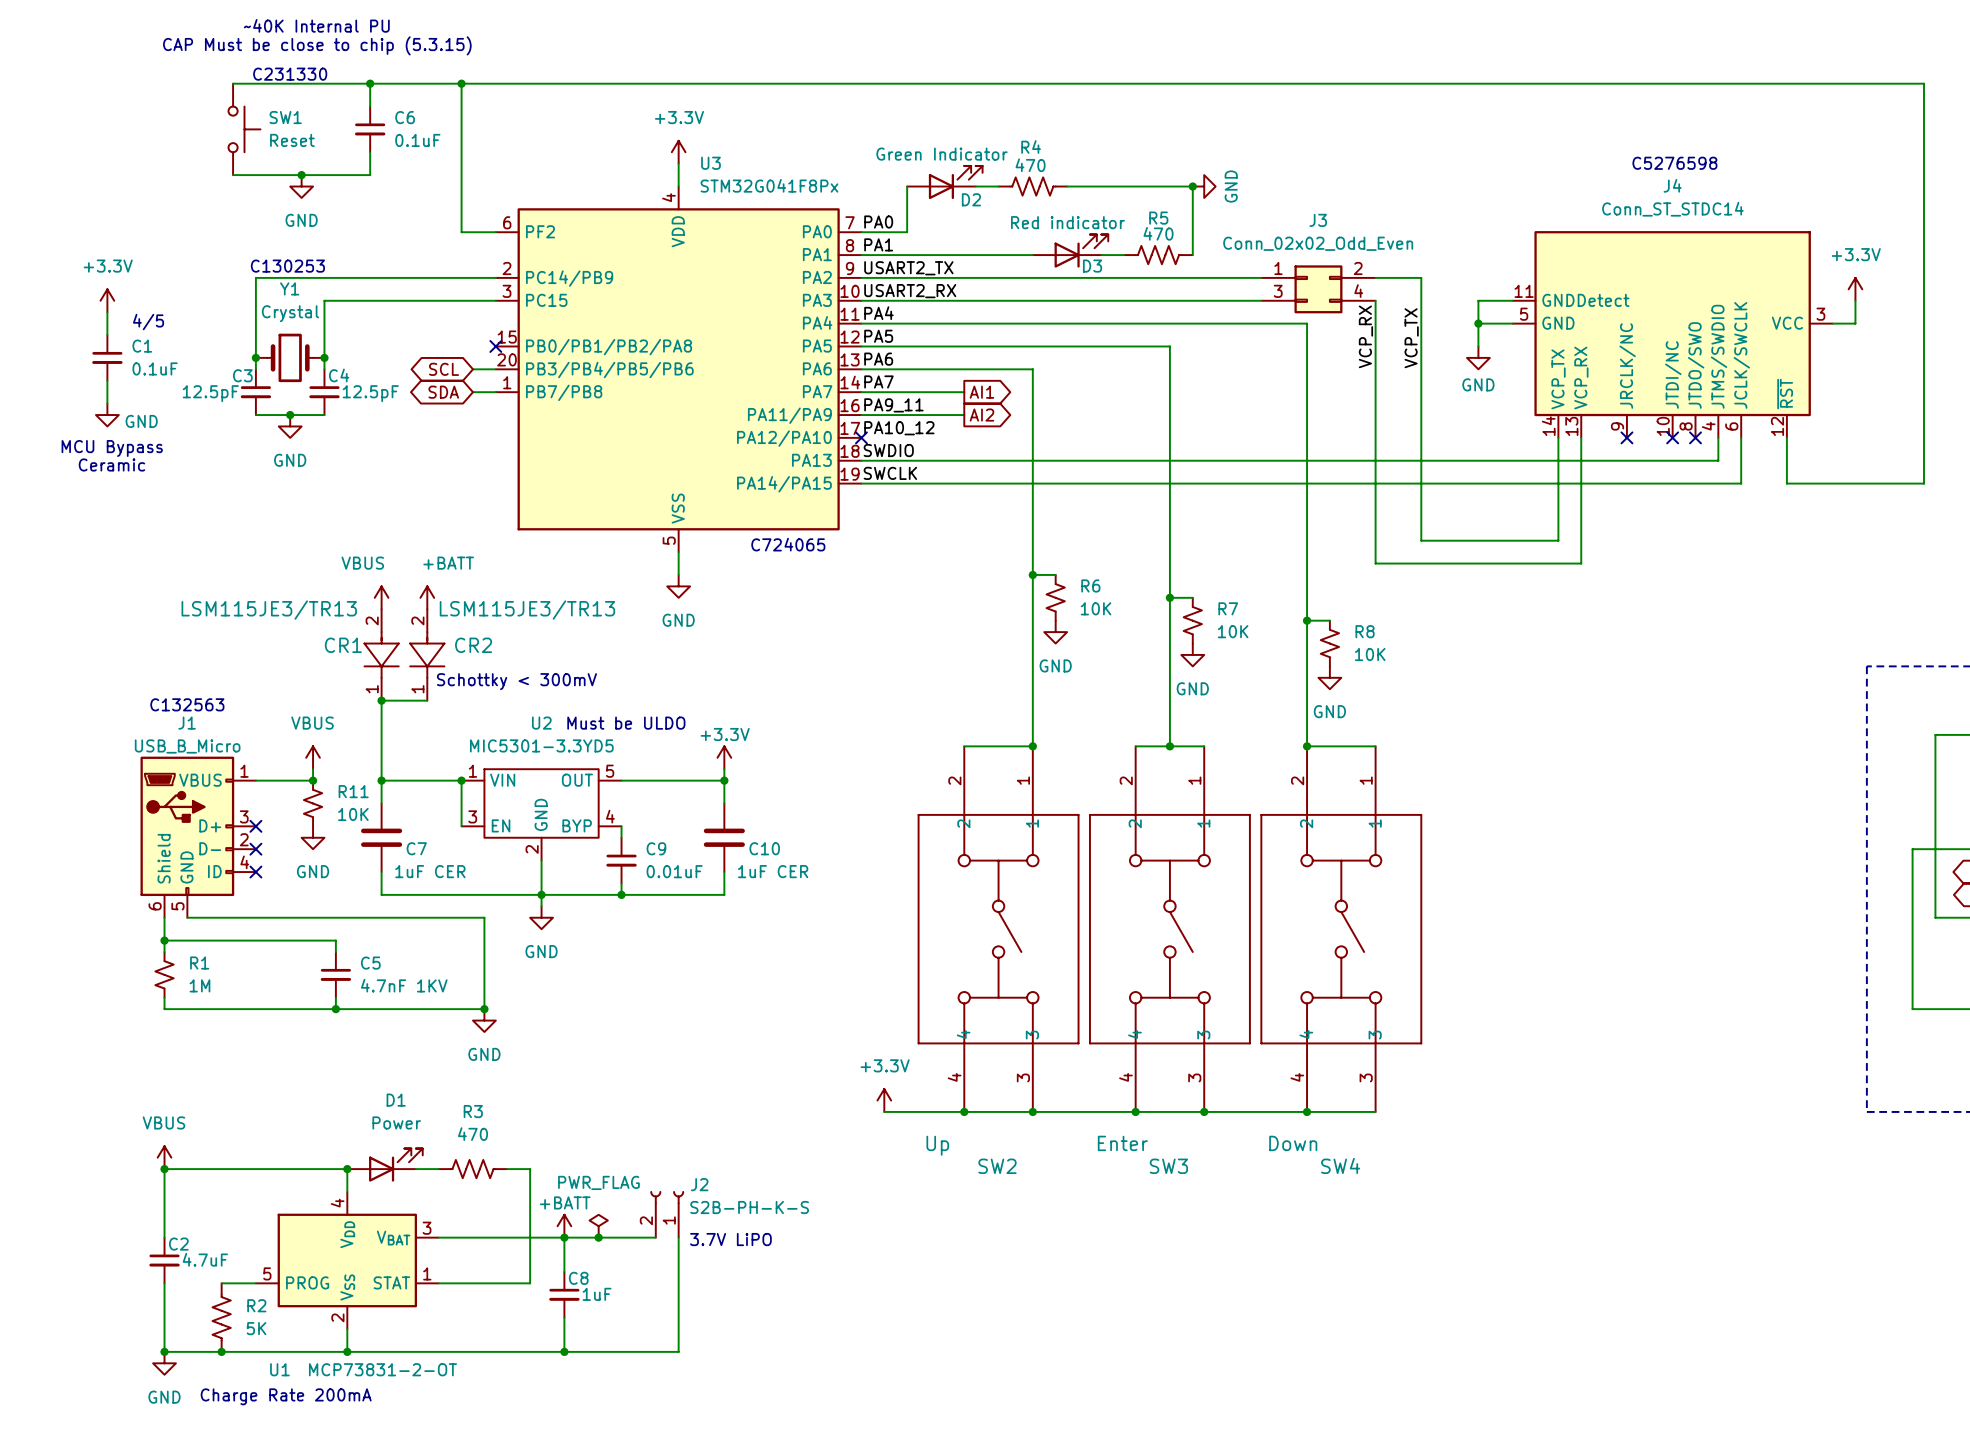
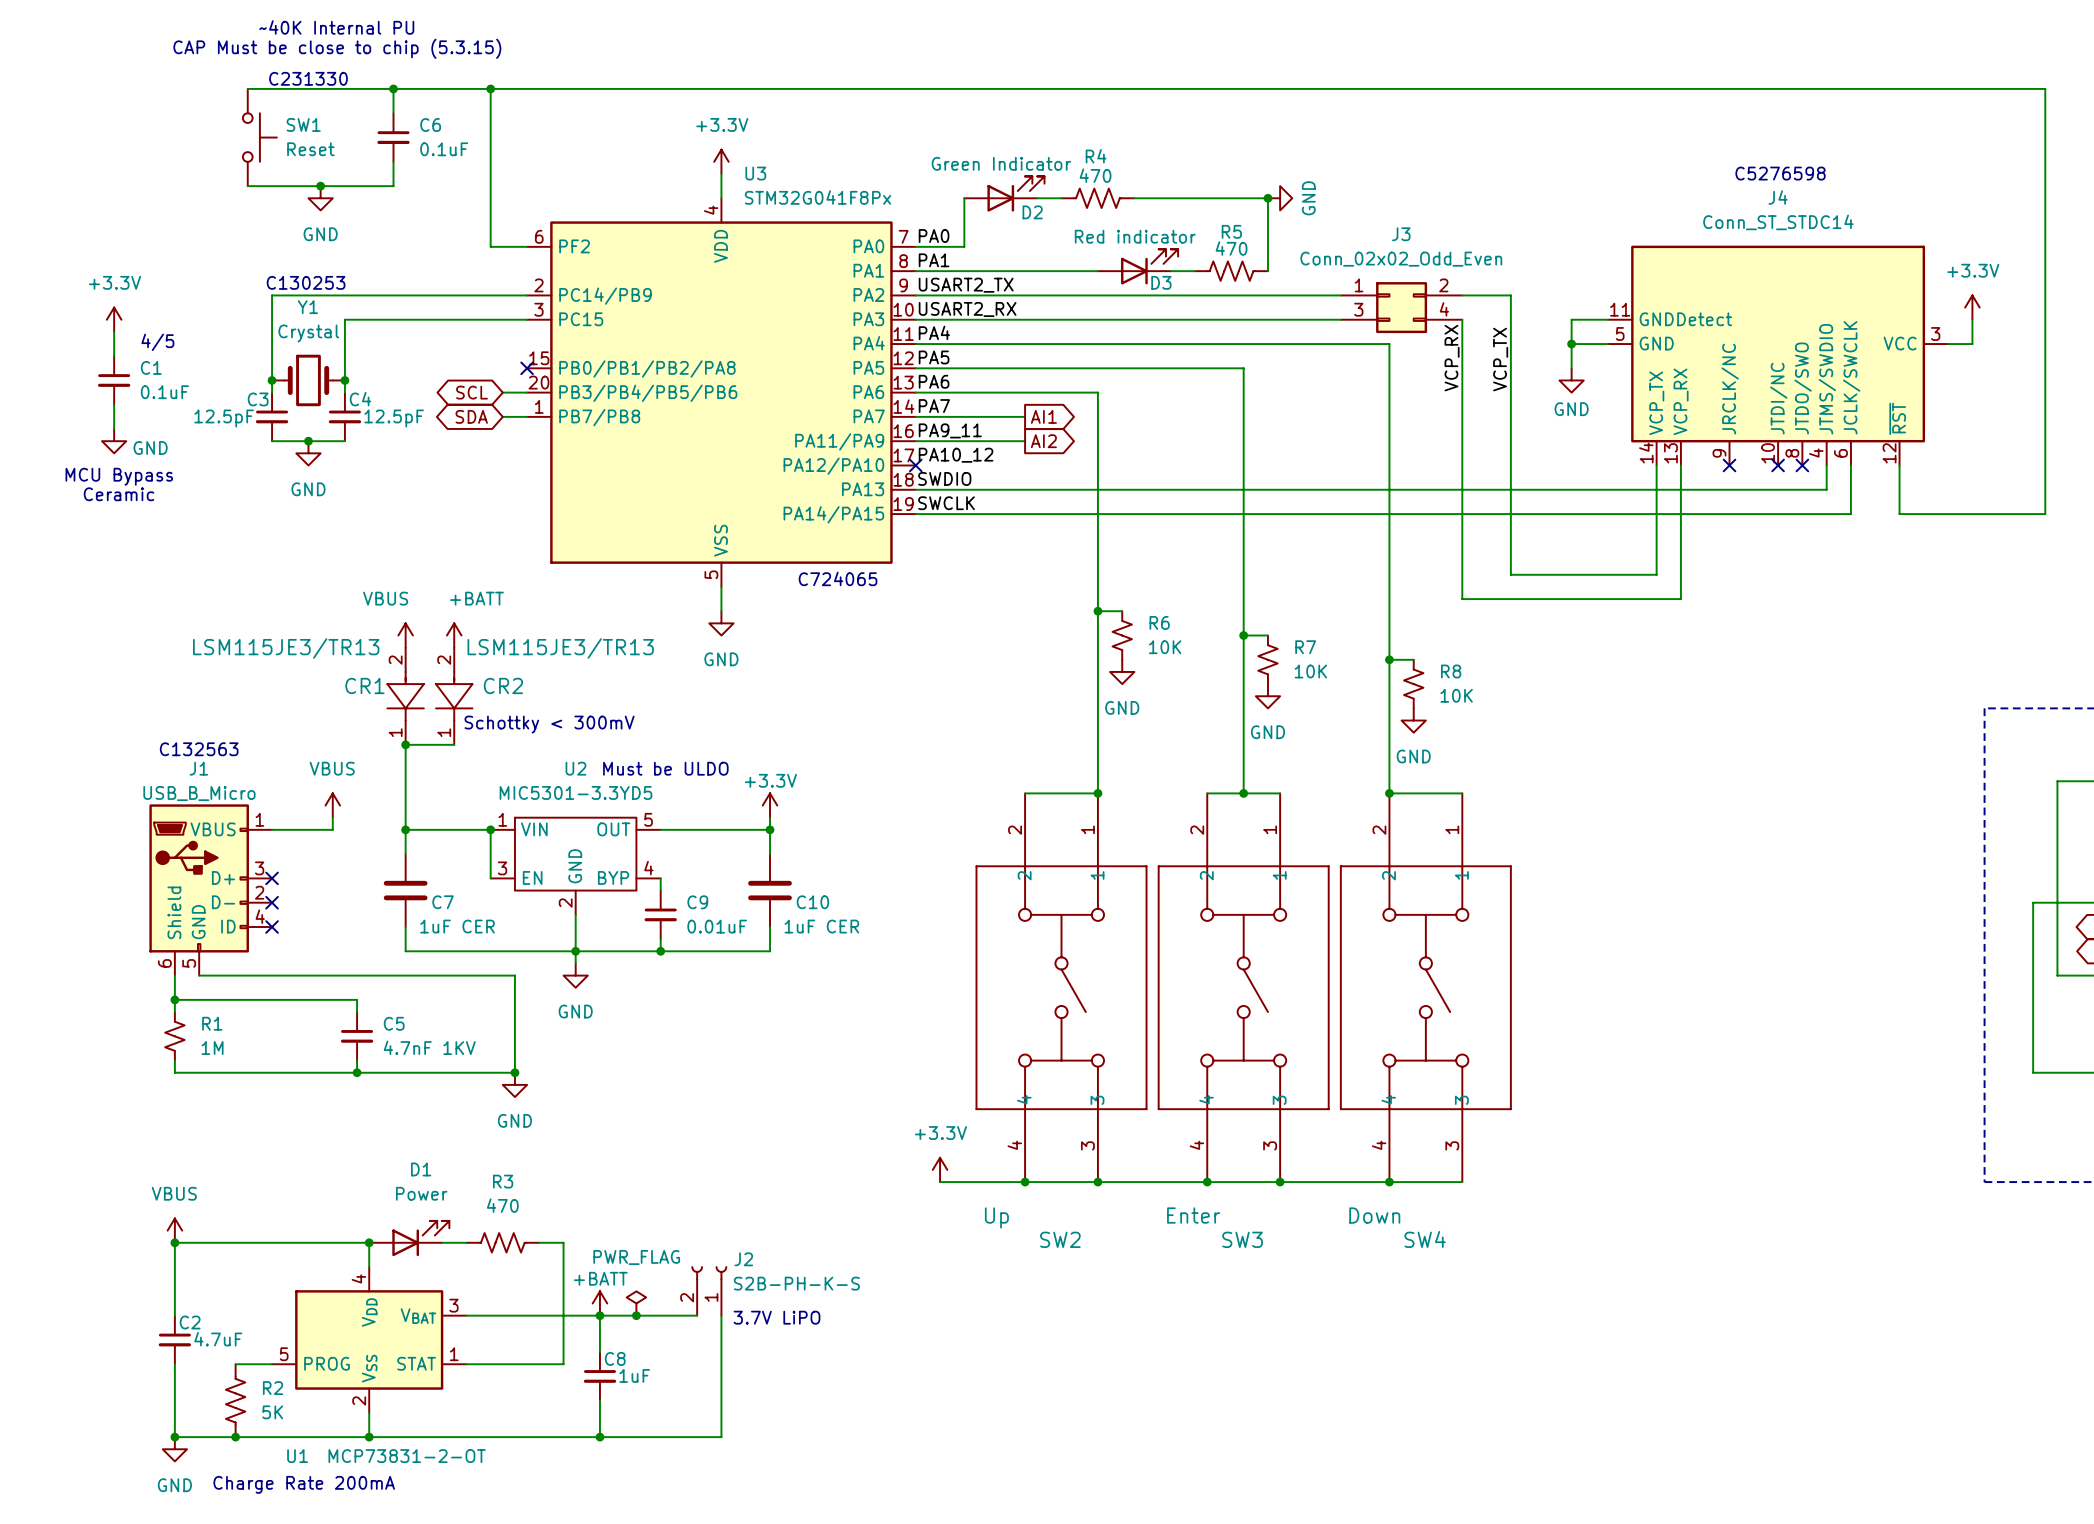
junction: (313, 780) -> none
R11: 10K (313, 803) -> none
power symbol: GND (313, 837) -> none

